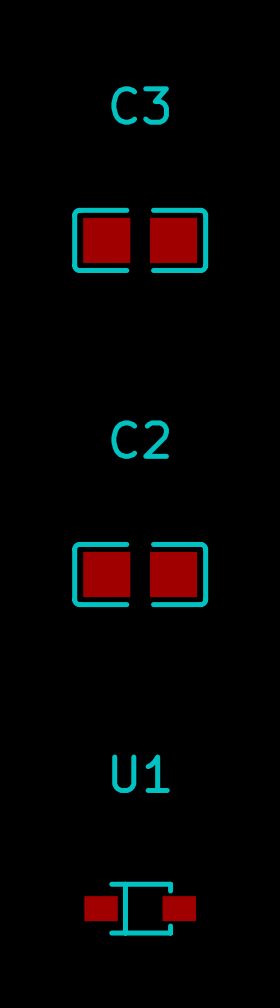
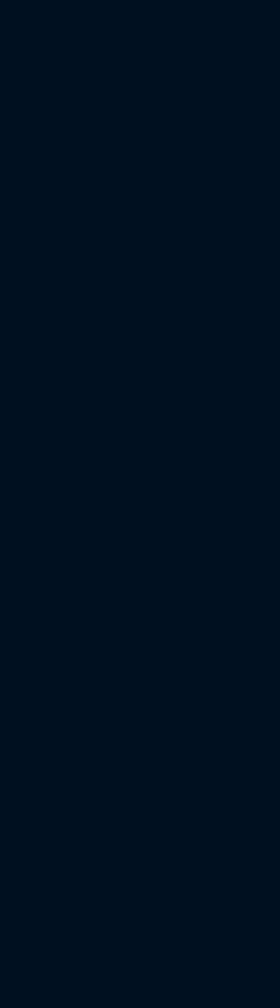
C3: (140, 240) -> none
C2: (140, 574) -> none
U1: (140, 908) -> none

